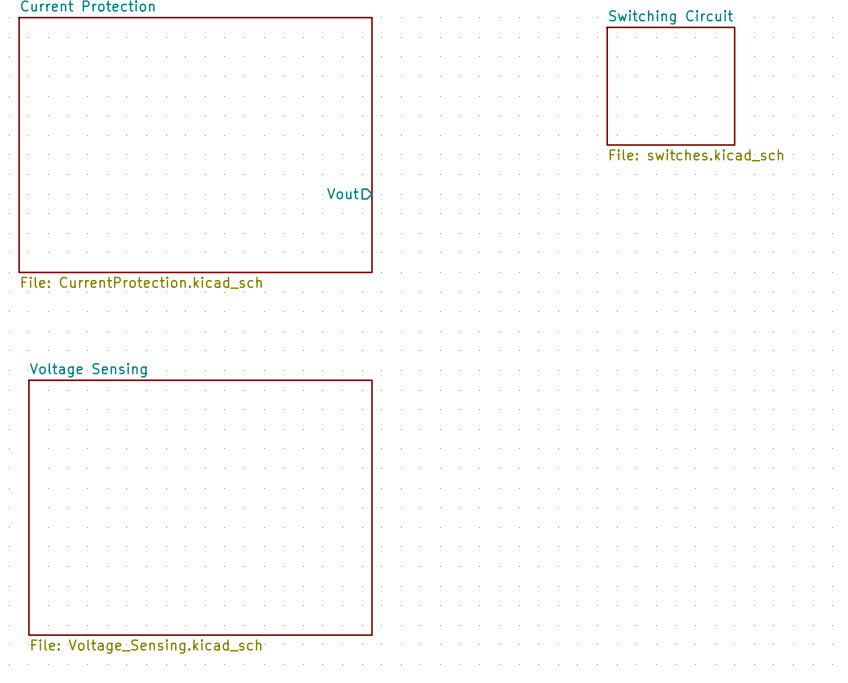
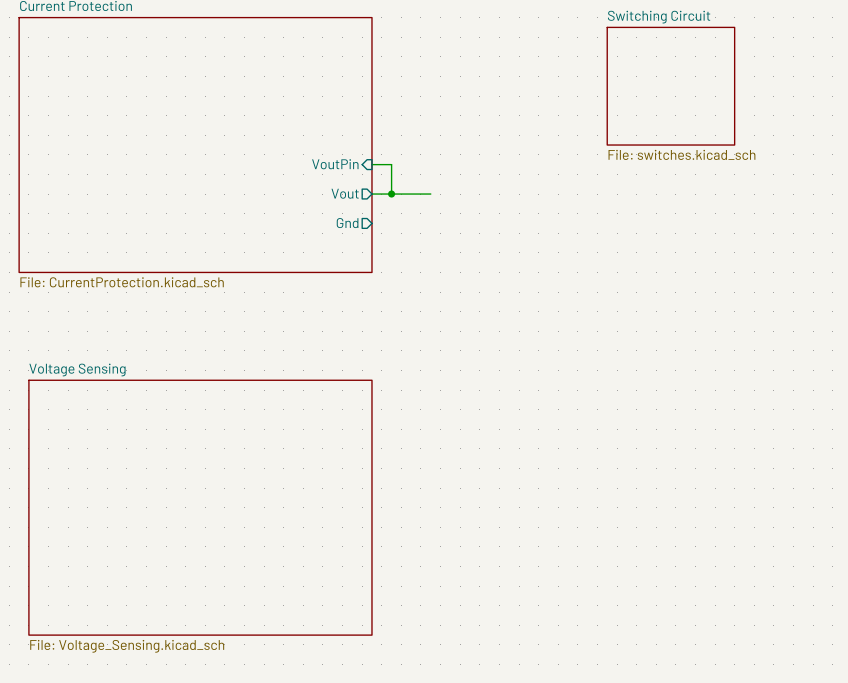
sheet pin: none -> VoutPin (335, 164)
wire: none -> (371, 164) (391, 164) (391, 194)
wire: none -> (371, 194) (430, 194)
junction: none -> (391, 194)
sheet pin: none -> Gnd (347, 223)

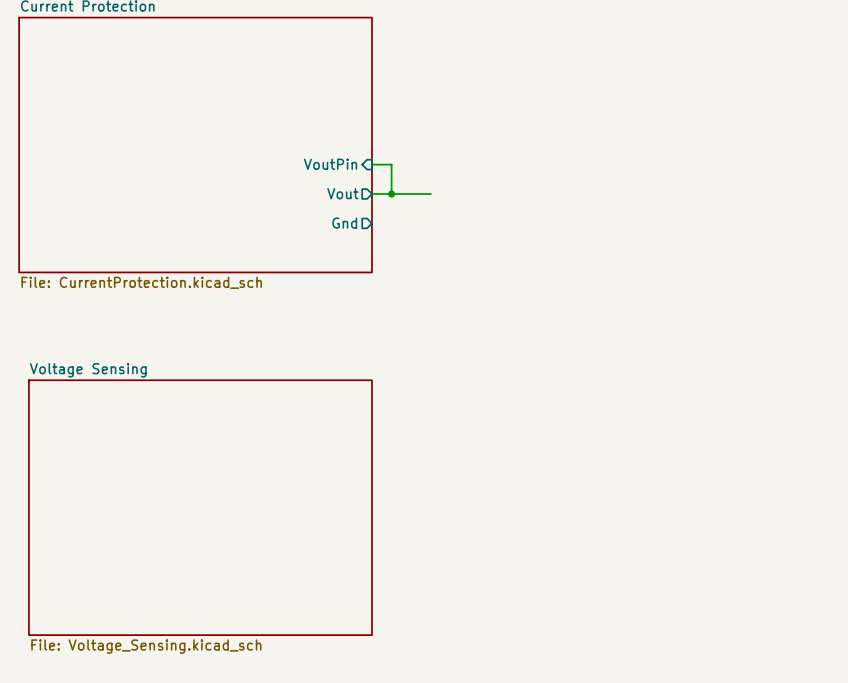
sheet Switching Circuit: File: switches.kicad_sch (670, 86) -> none

